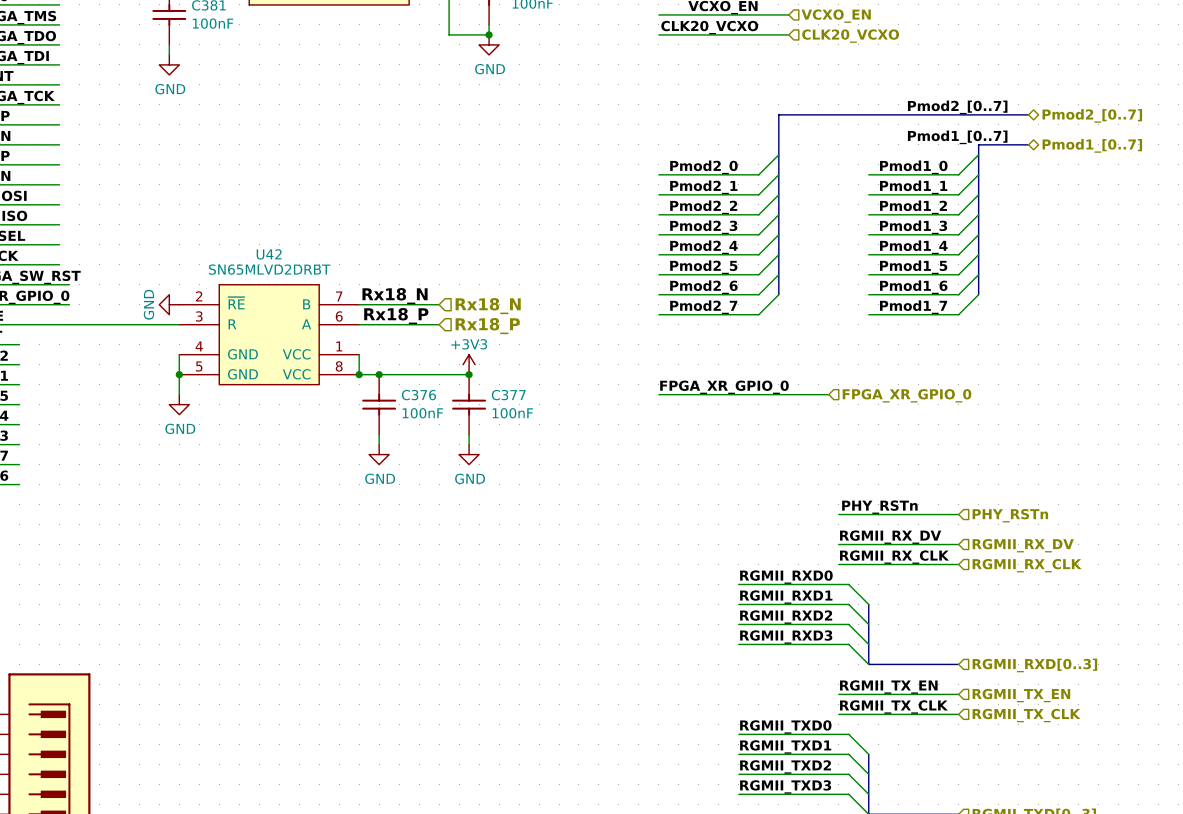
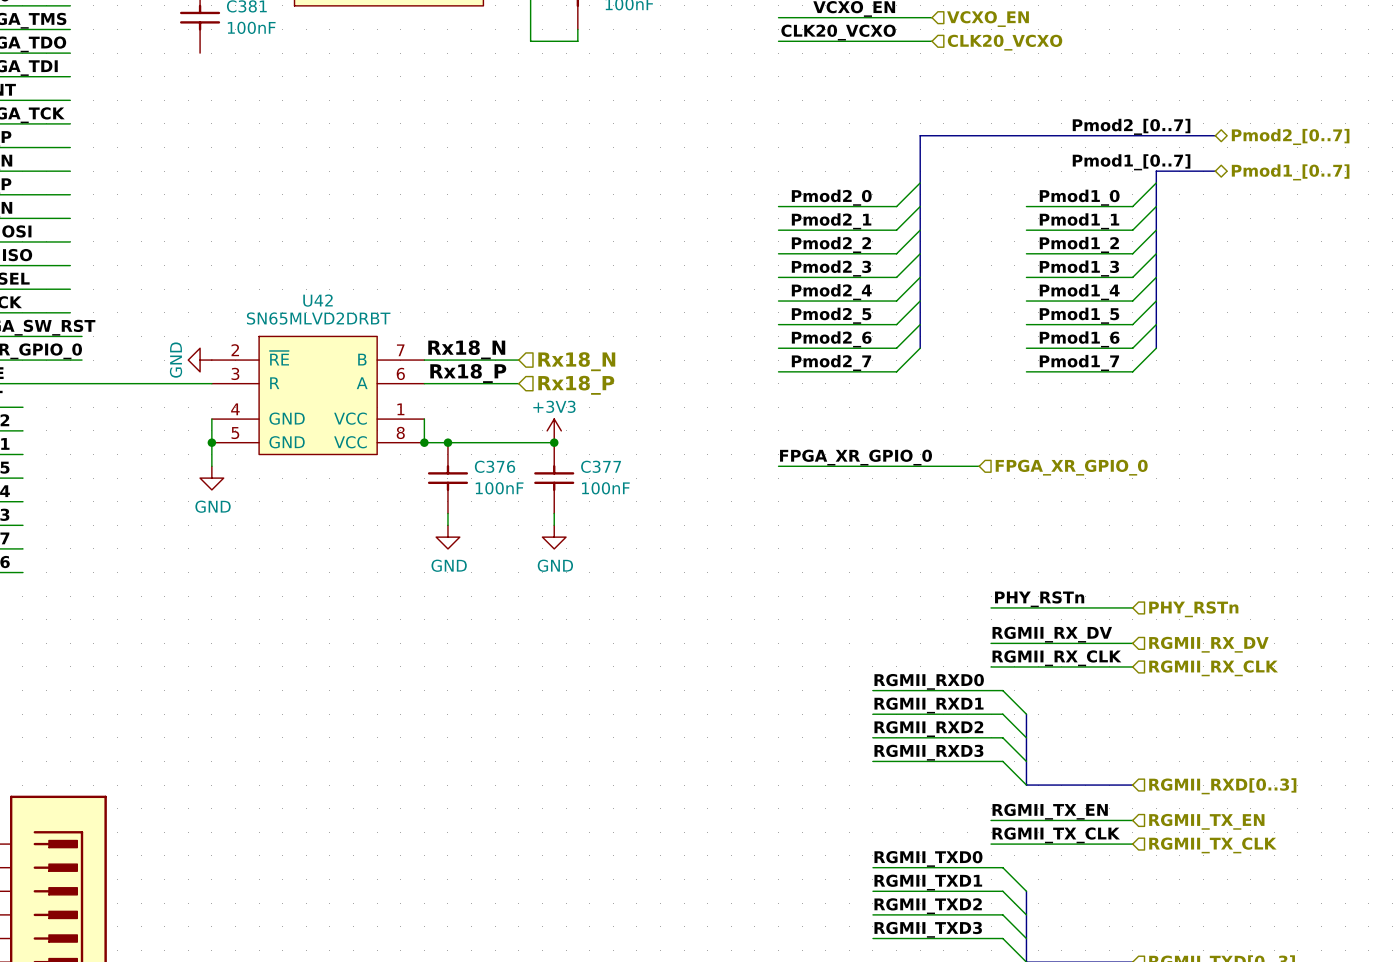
junction: (489, 34) -> none
wire: (169, 44) (169, 54) -> none
power symbol: GND (489, 44) -> none
power symbol: GND (169, 64) -> none

